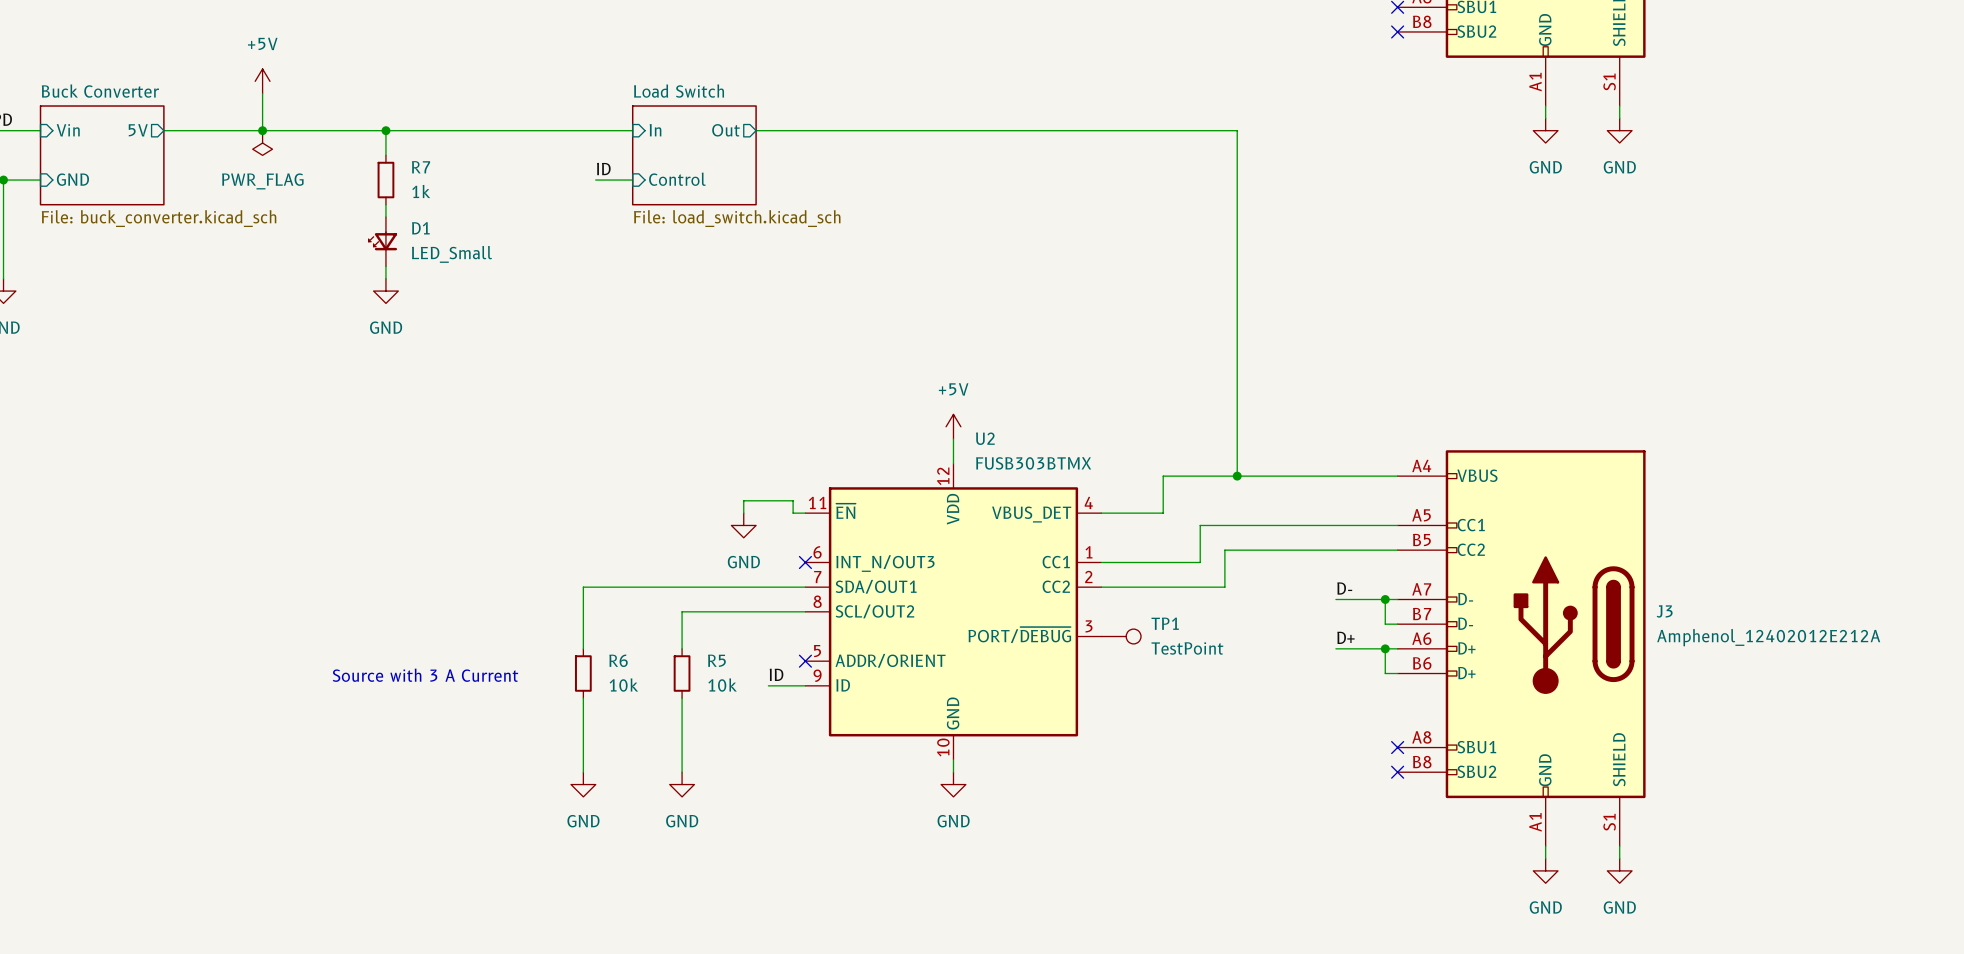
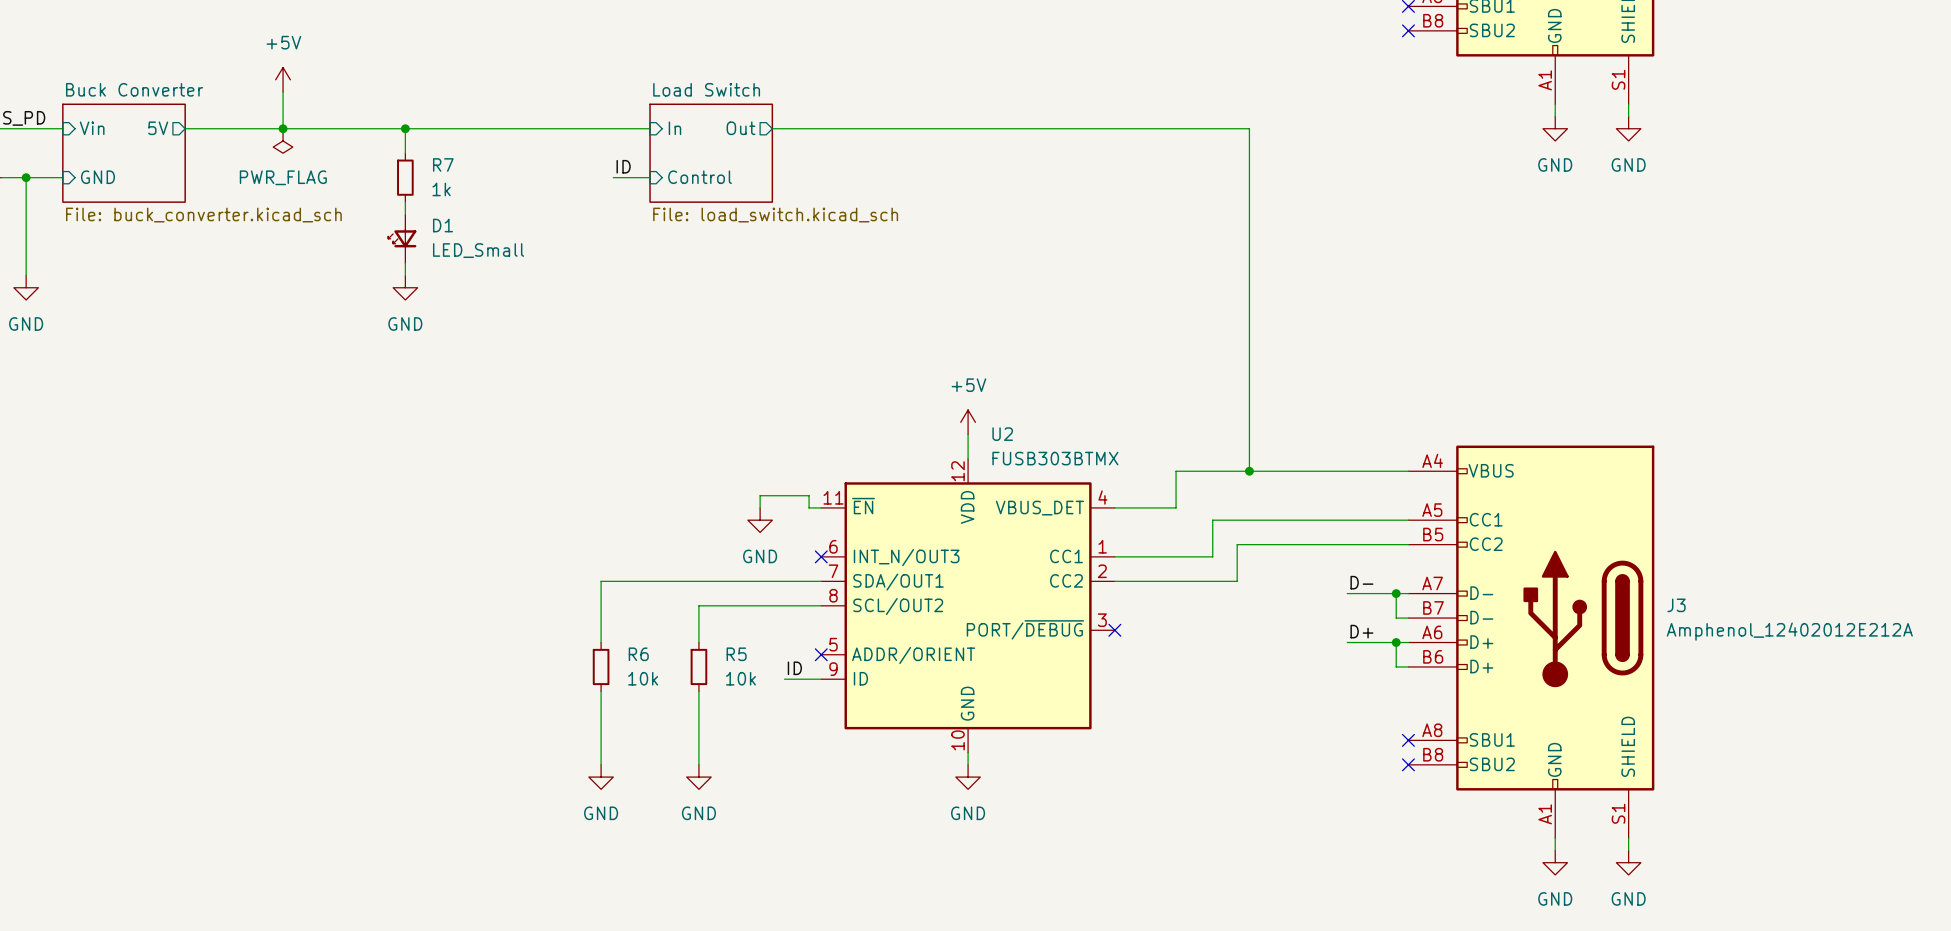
no-connect mark: none -> (1114, 630)
TP1: TestPoint (1121, 636) -> none
text: Source with 3 A Current (425, 675) -> none

